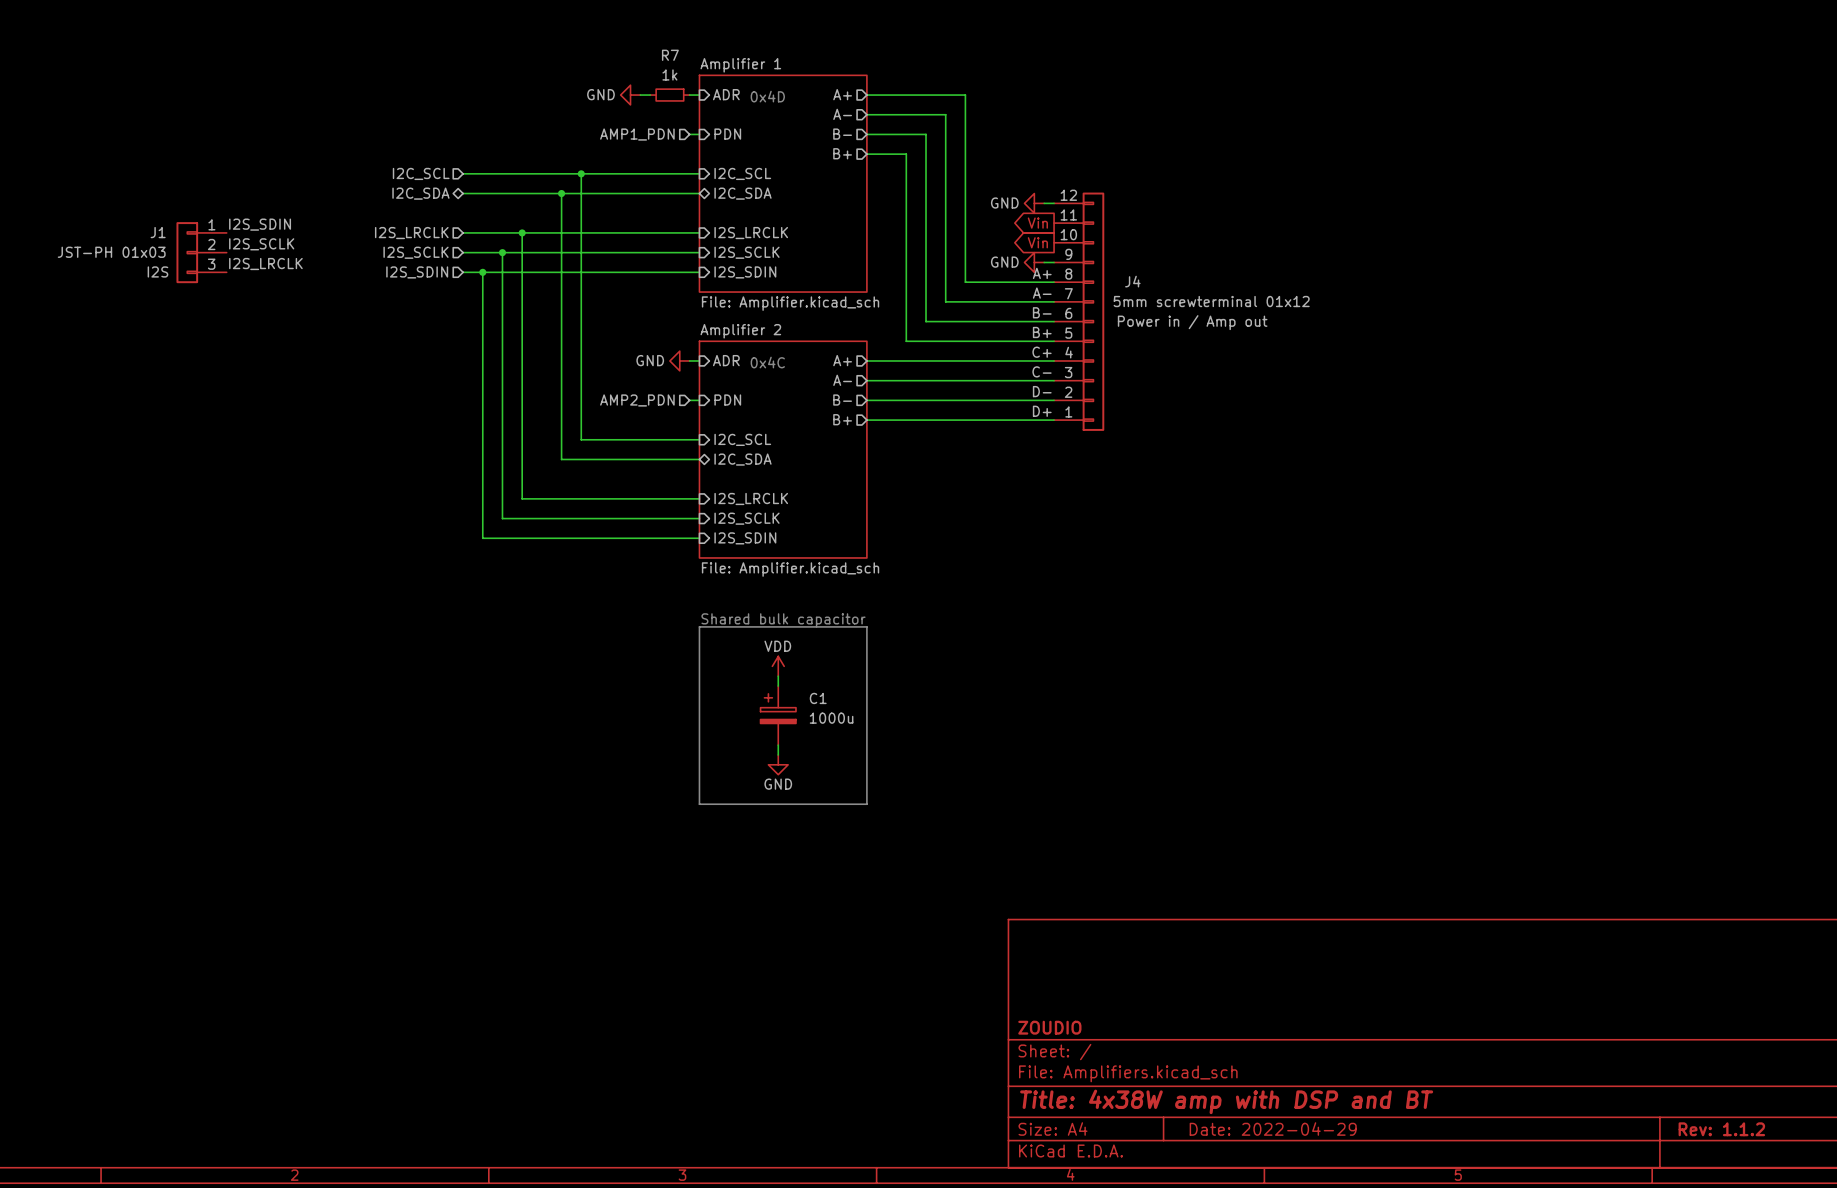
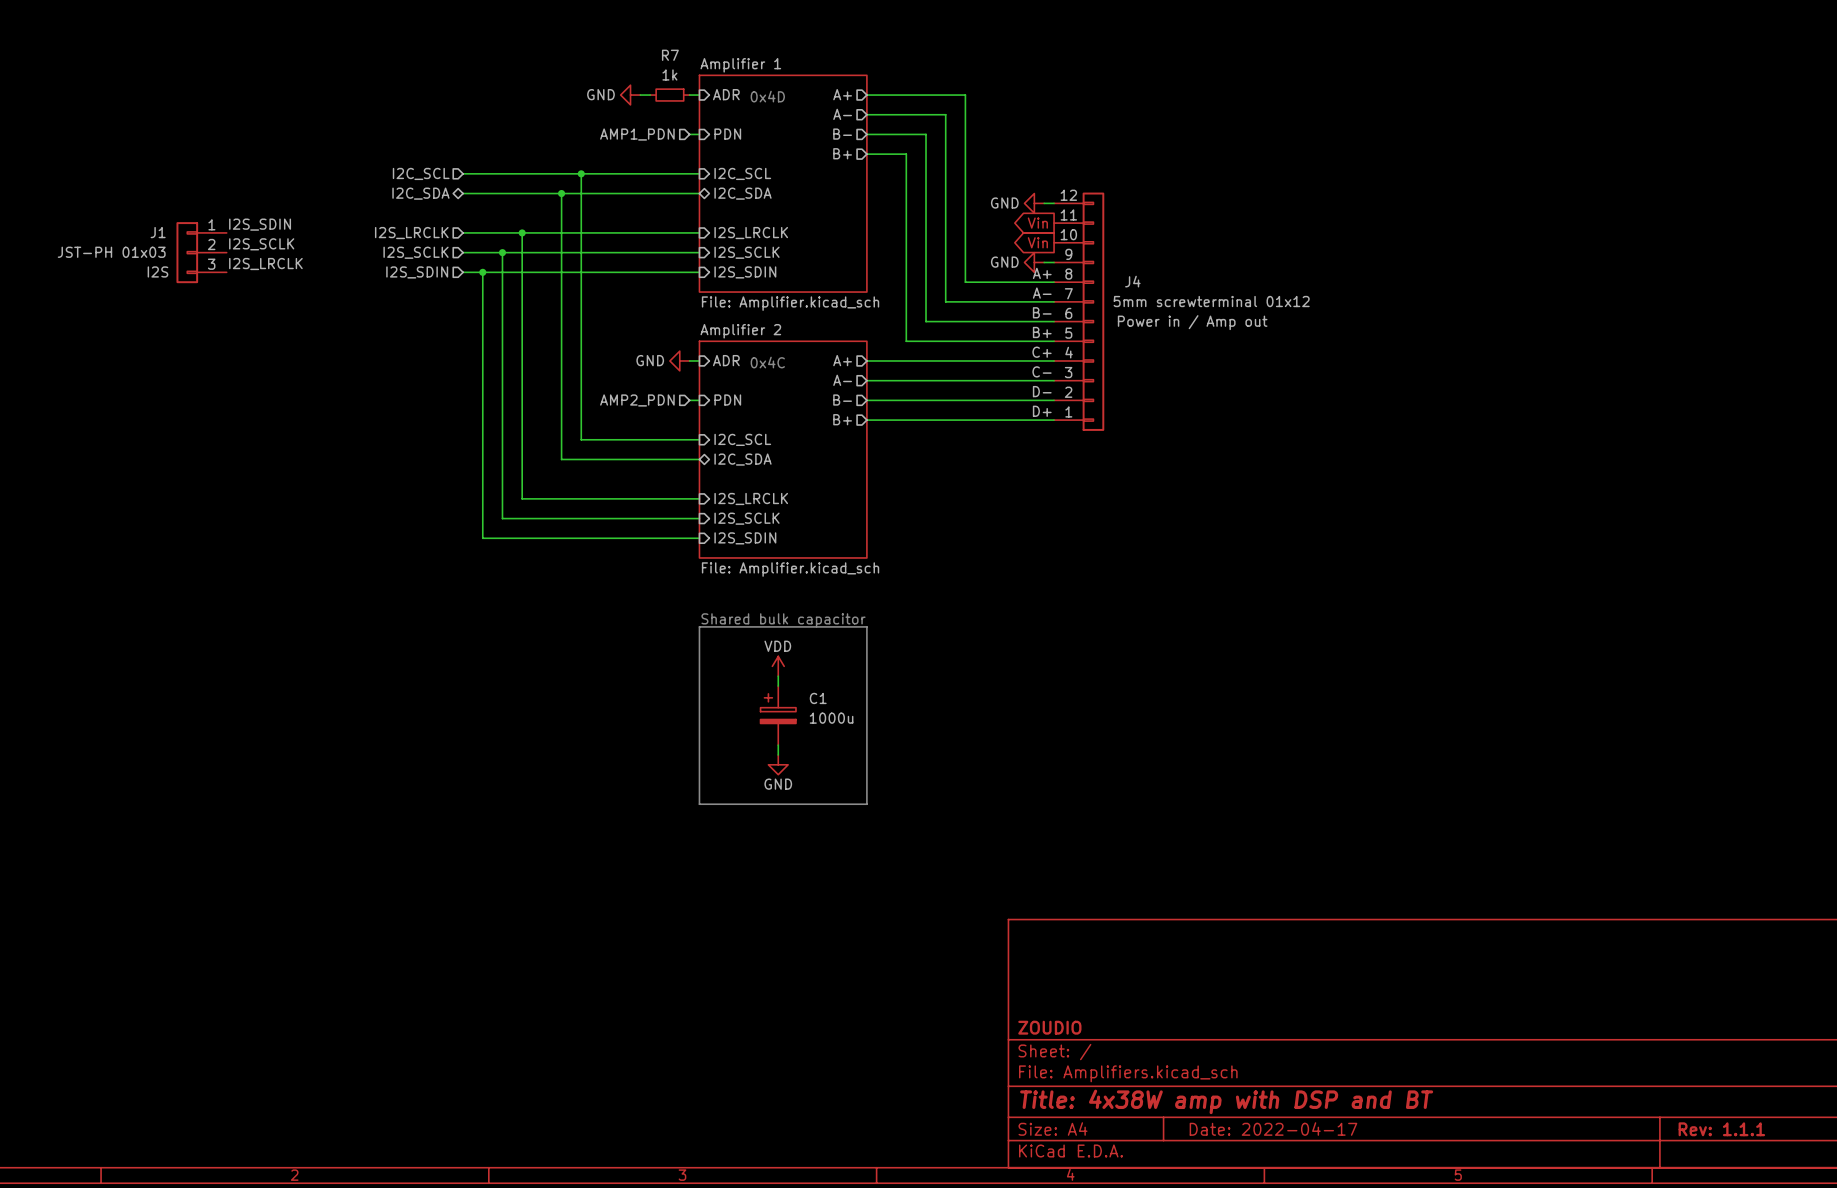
title block: Date: 2022-04-29 (1273, 1129) -> Date: 2022-04-17 (1273, 1129)
title block: Rev: 1.1.2 (1721, 1129) -> Rev: 1.1.1 (1721, 1129)

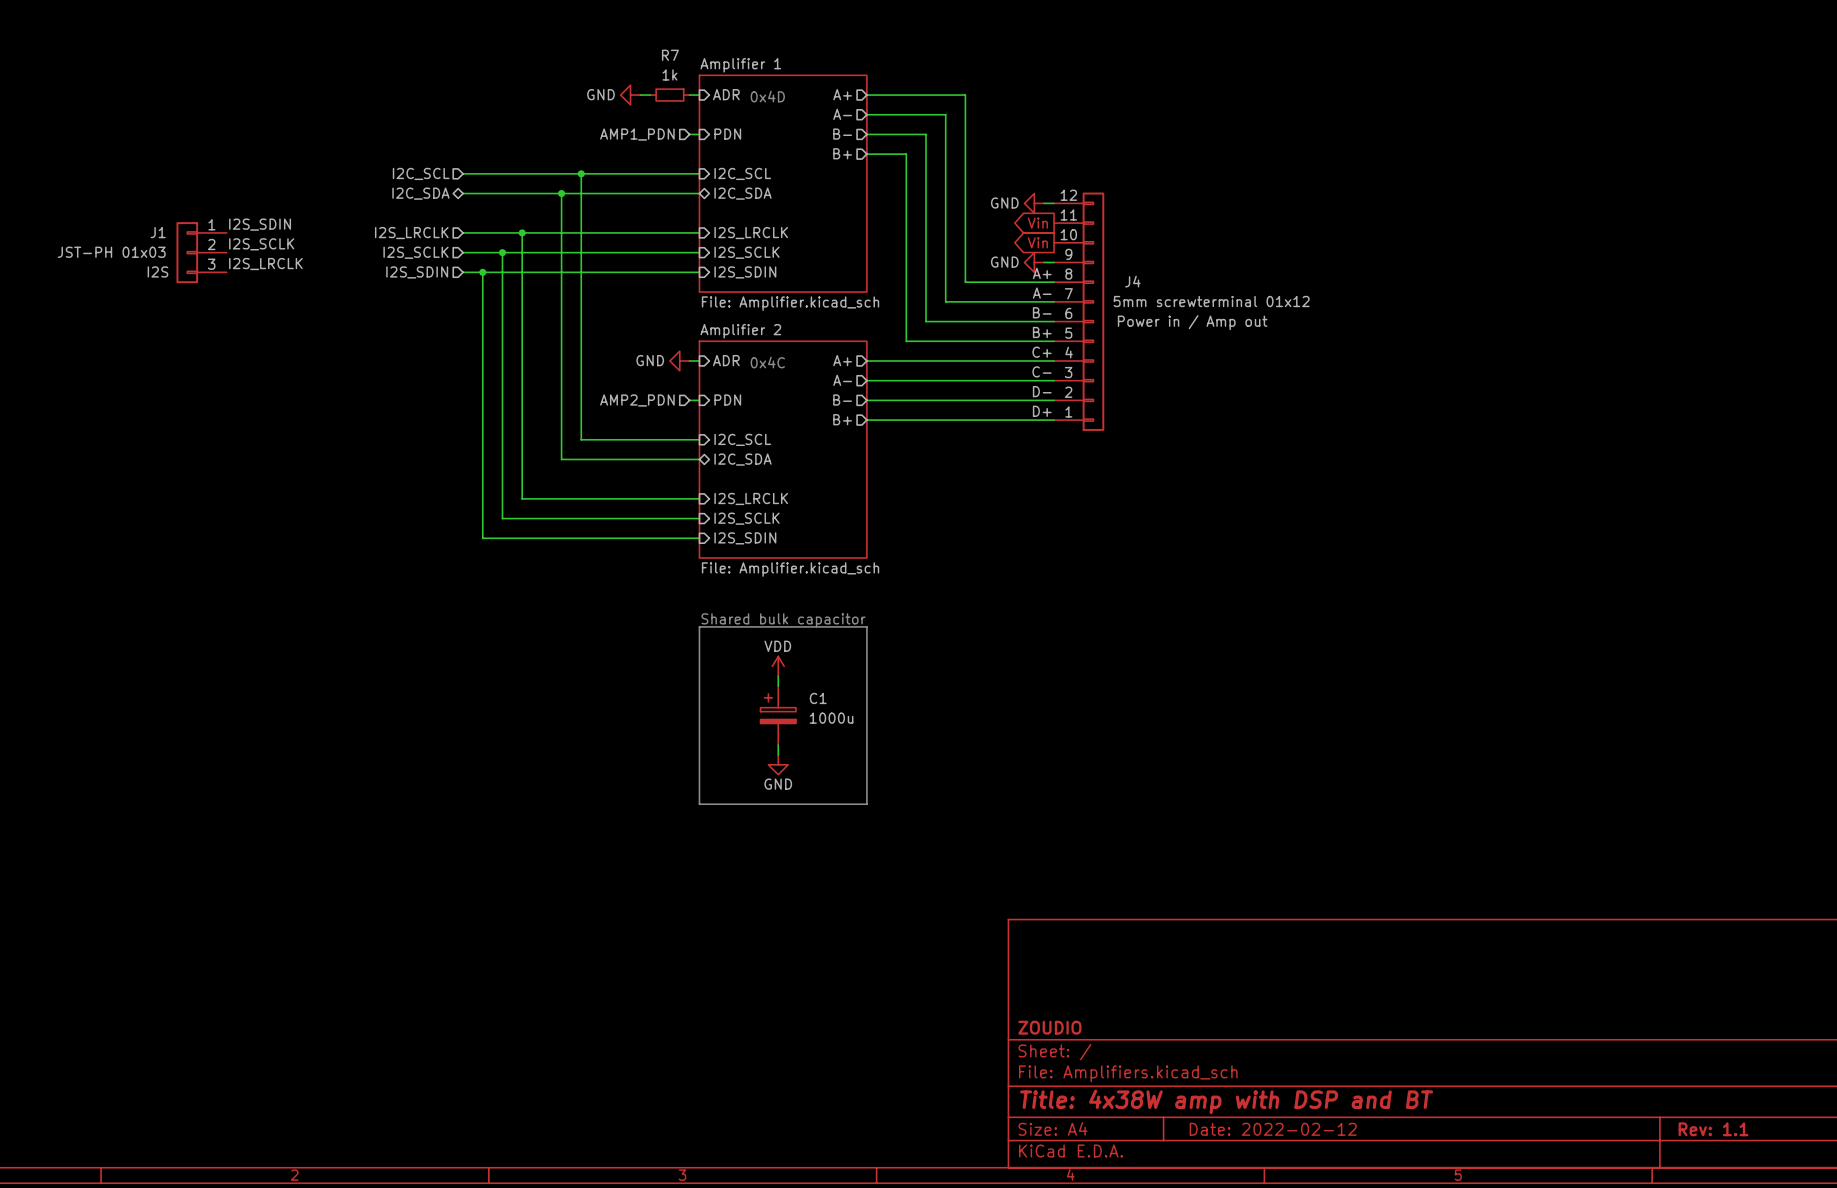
title block: Date: 2022-04-17 (1273, 1129) -> Date: 2022-02-12 (1273, 1129)
title block: Rev: 1.1.1 (1721, 1129) -> Rev: 1.1 (1713, 1129)

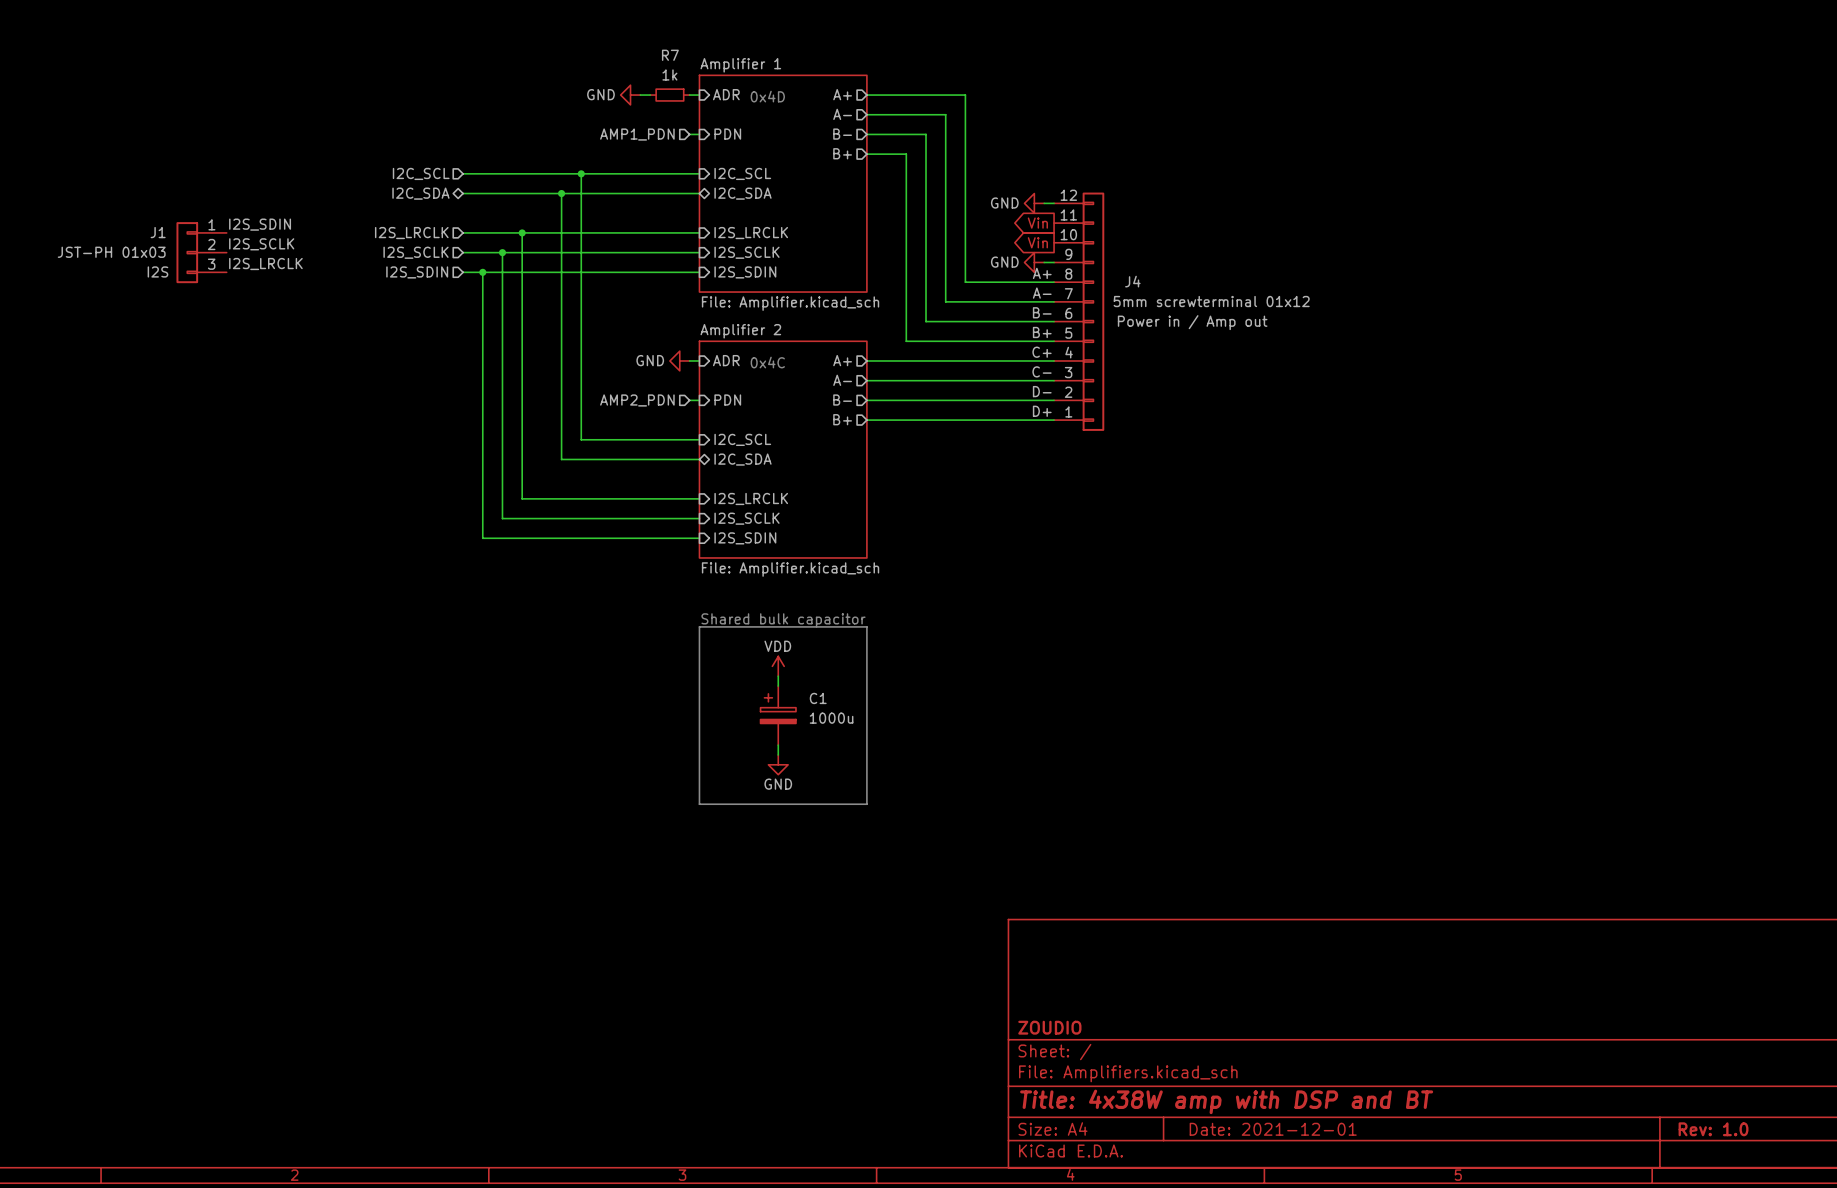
title block: Date: 2022-02-12 (1273, 1129) -> Date: 2021-12-01 (1273, 1129)
title block: Rev: 1.1 (1713, 1129) -> Rev: 1.0 (1713, 1129)

